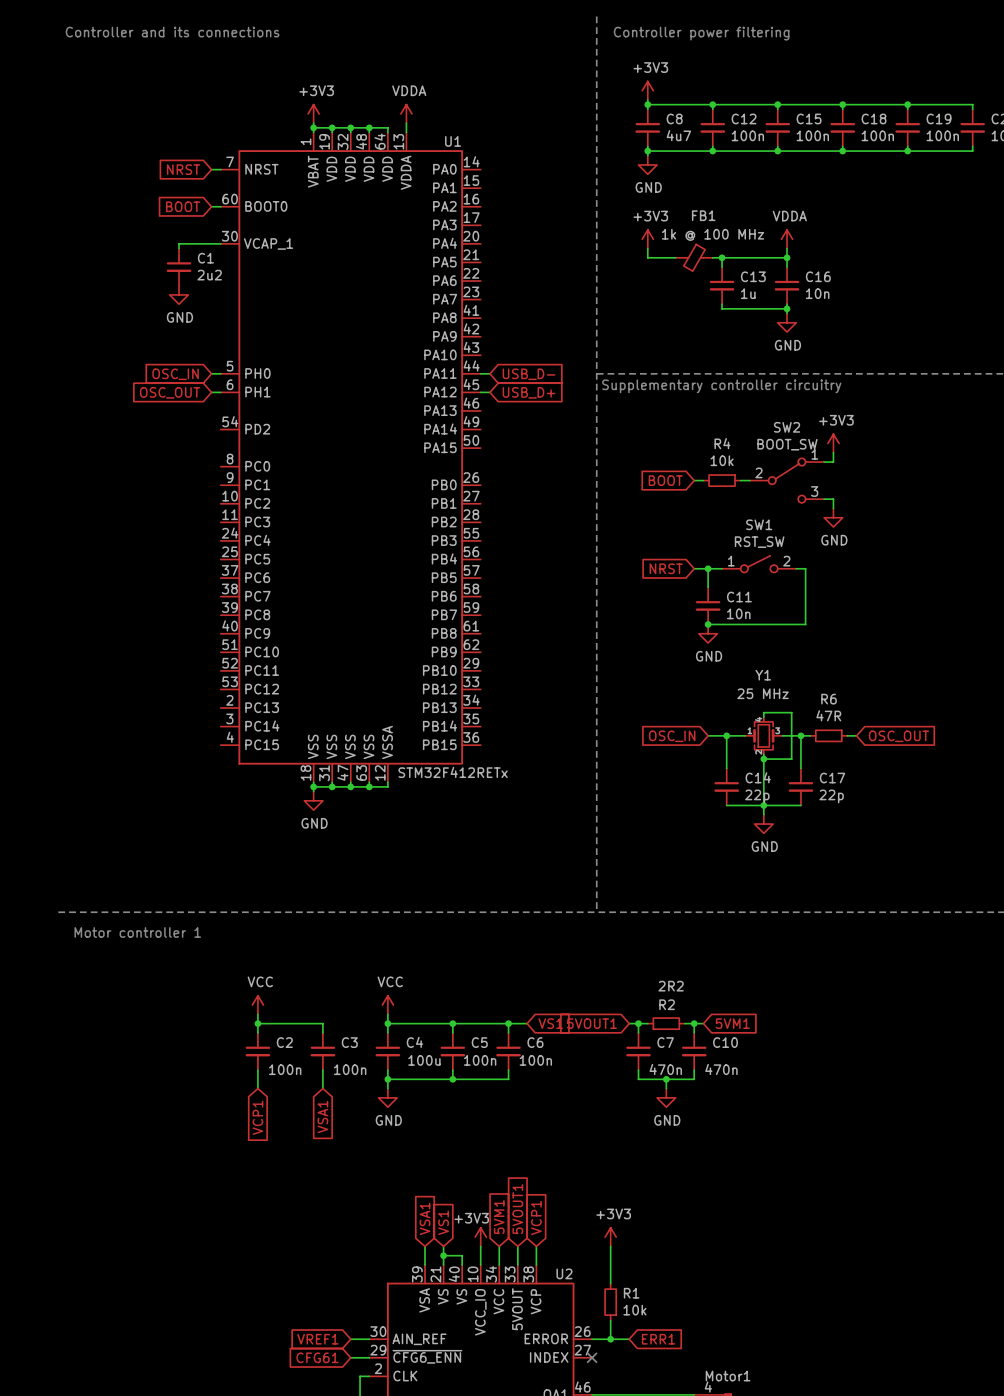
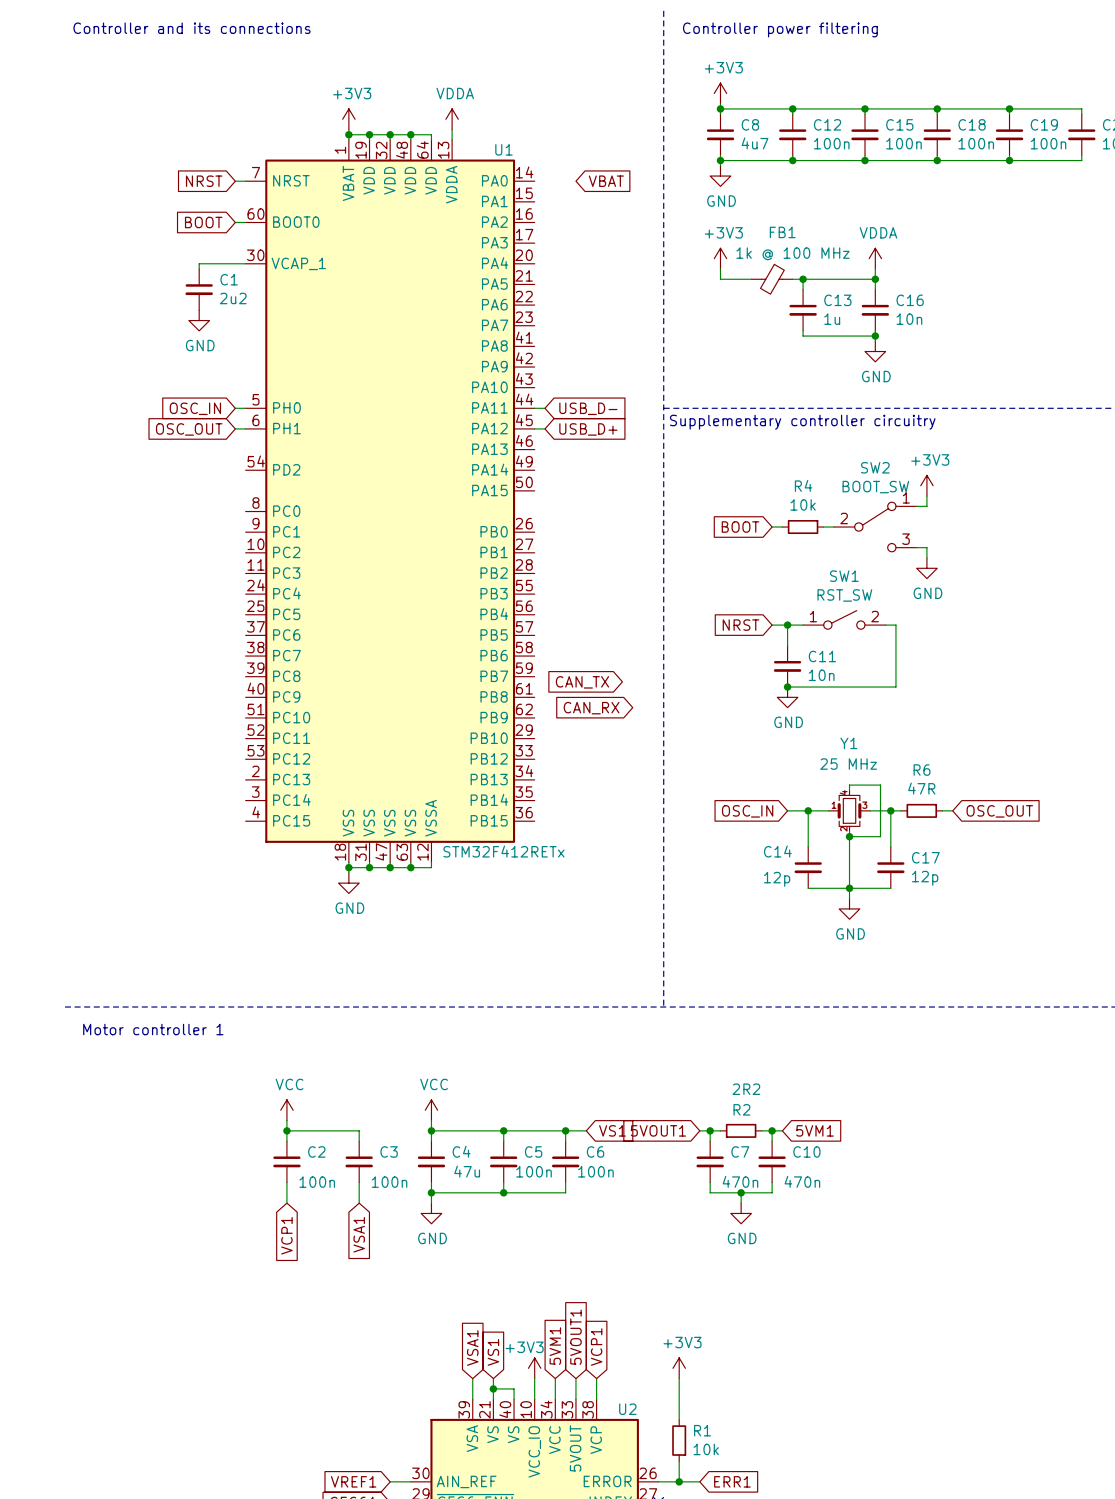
global label: none -> VBAT (606, 181)
global label: none -> CAN_TX (582, 682)
global label: none -> CAN_RX (591, 708)
C14 name position: C14 (758, 777) -> C14 (777, 851)
C14 value: 22p (757, 796) -> 12p (777, 879)
C17 value: 22p (831, 796) -> 12p (925, 878)
C4 value: 100u (424, 1060) -> 47u (467, 1171)

